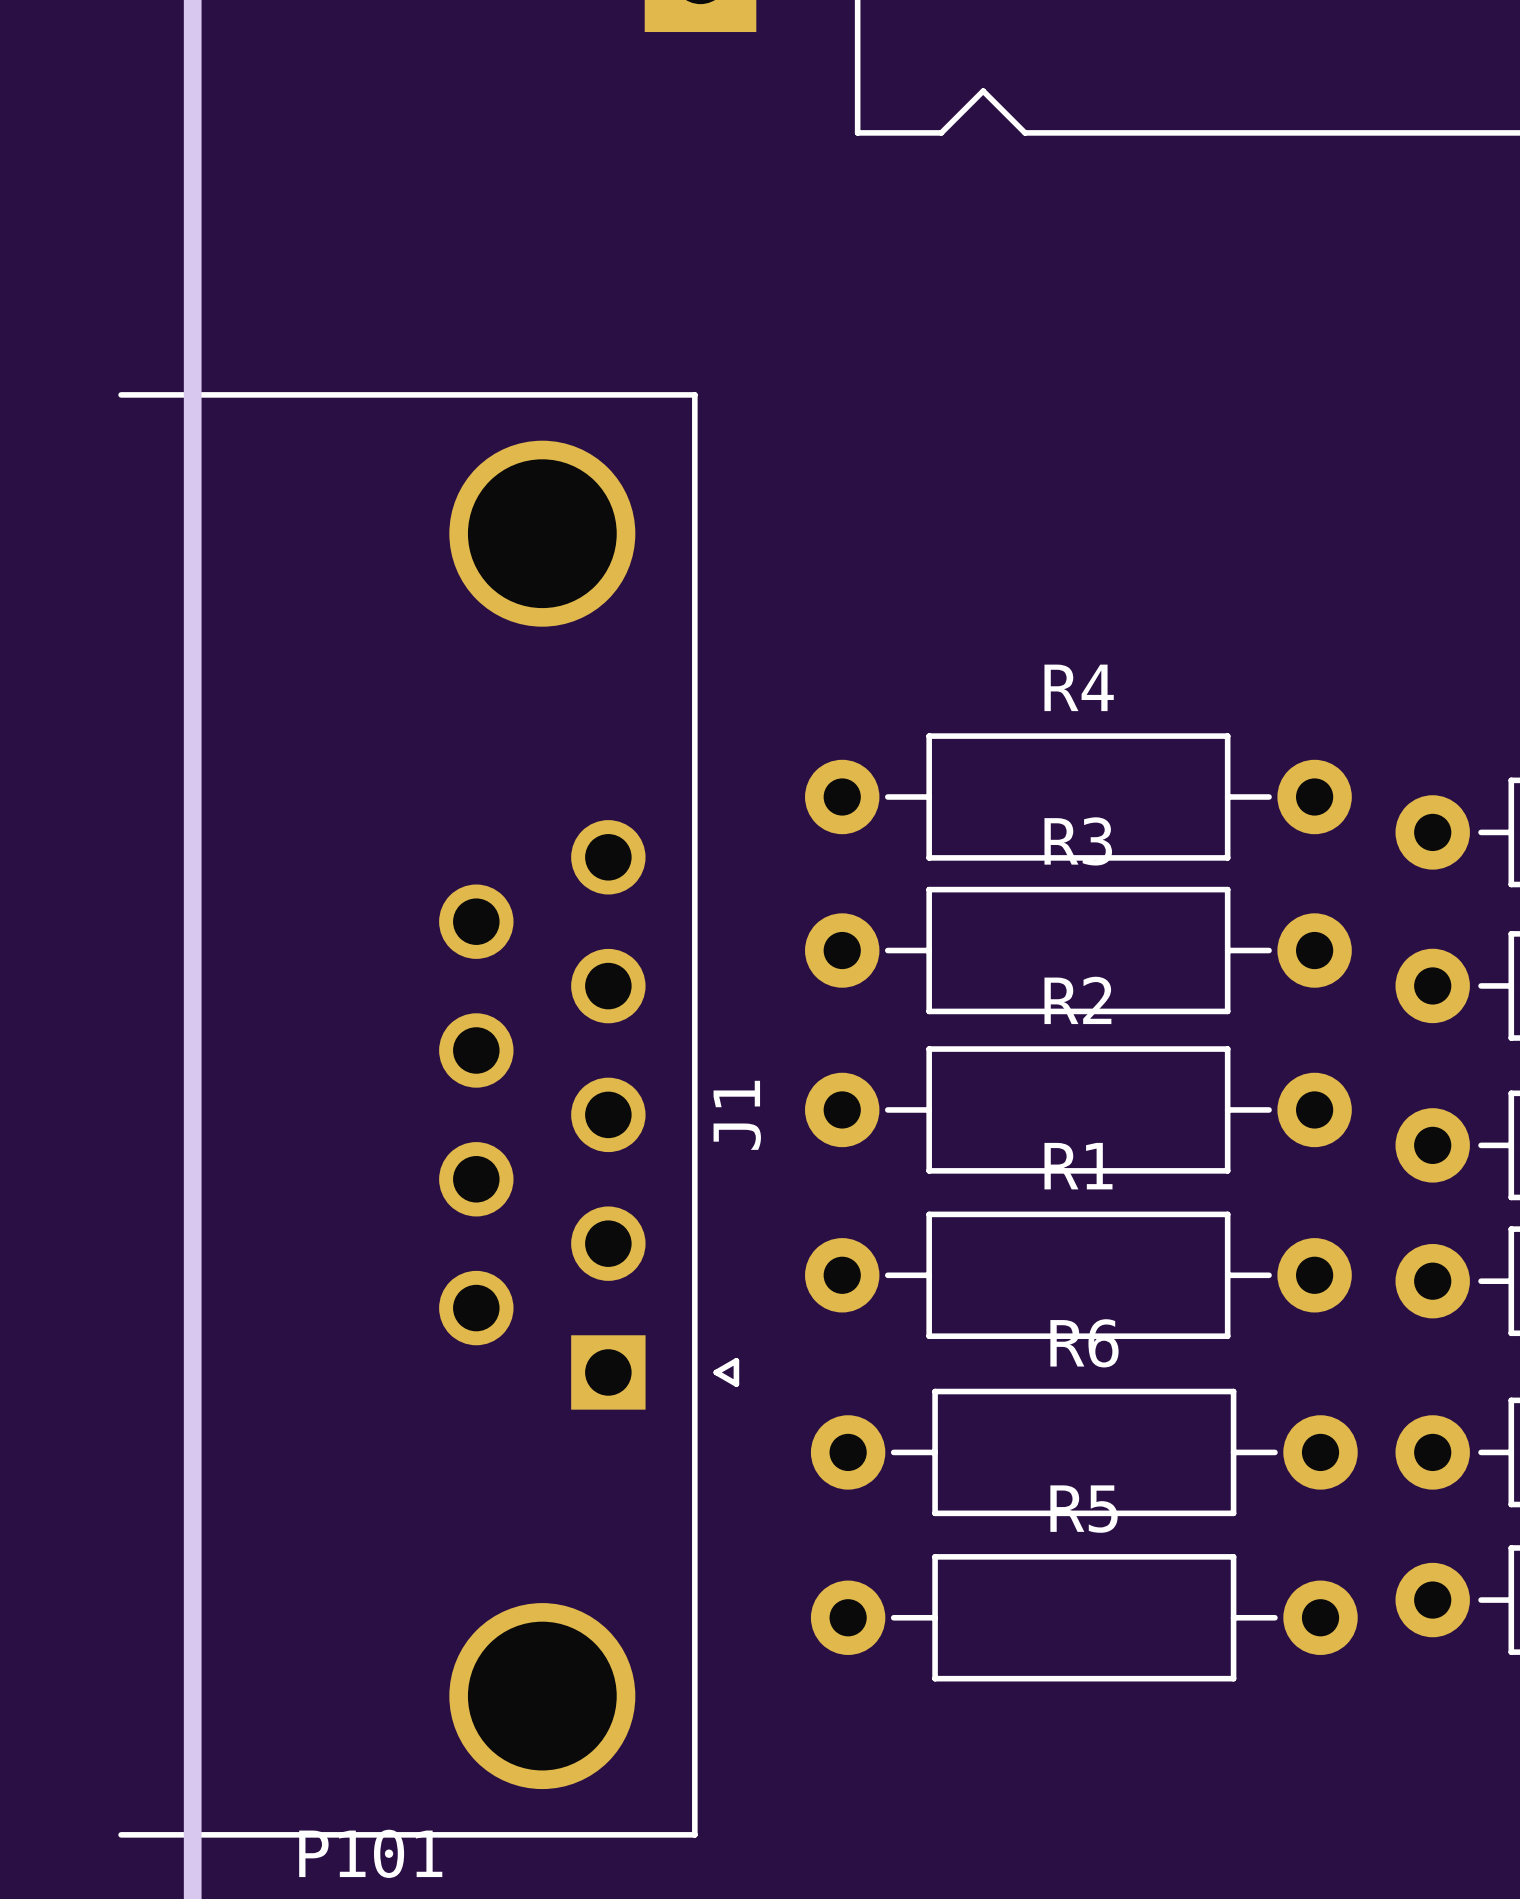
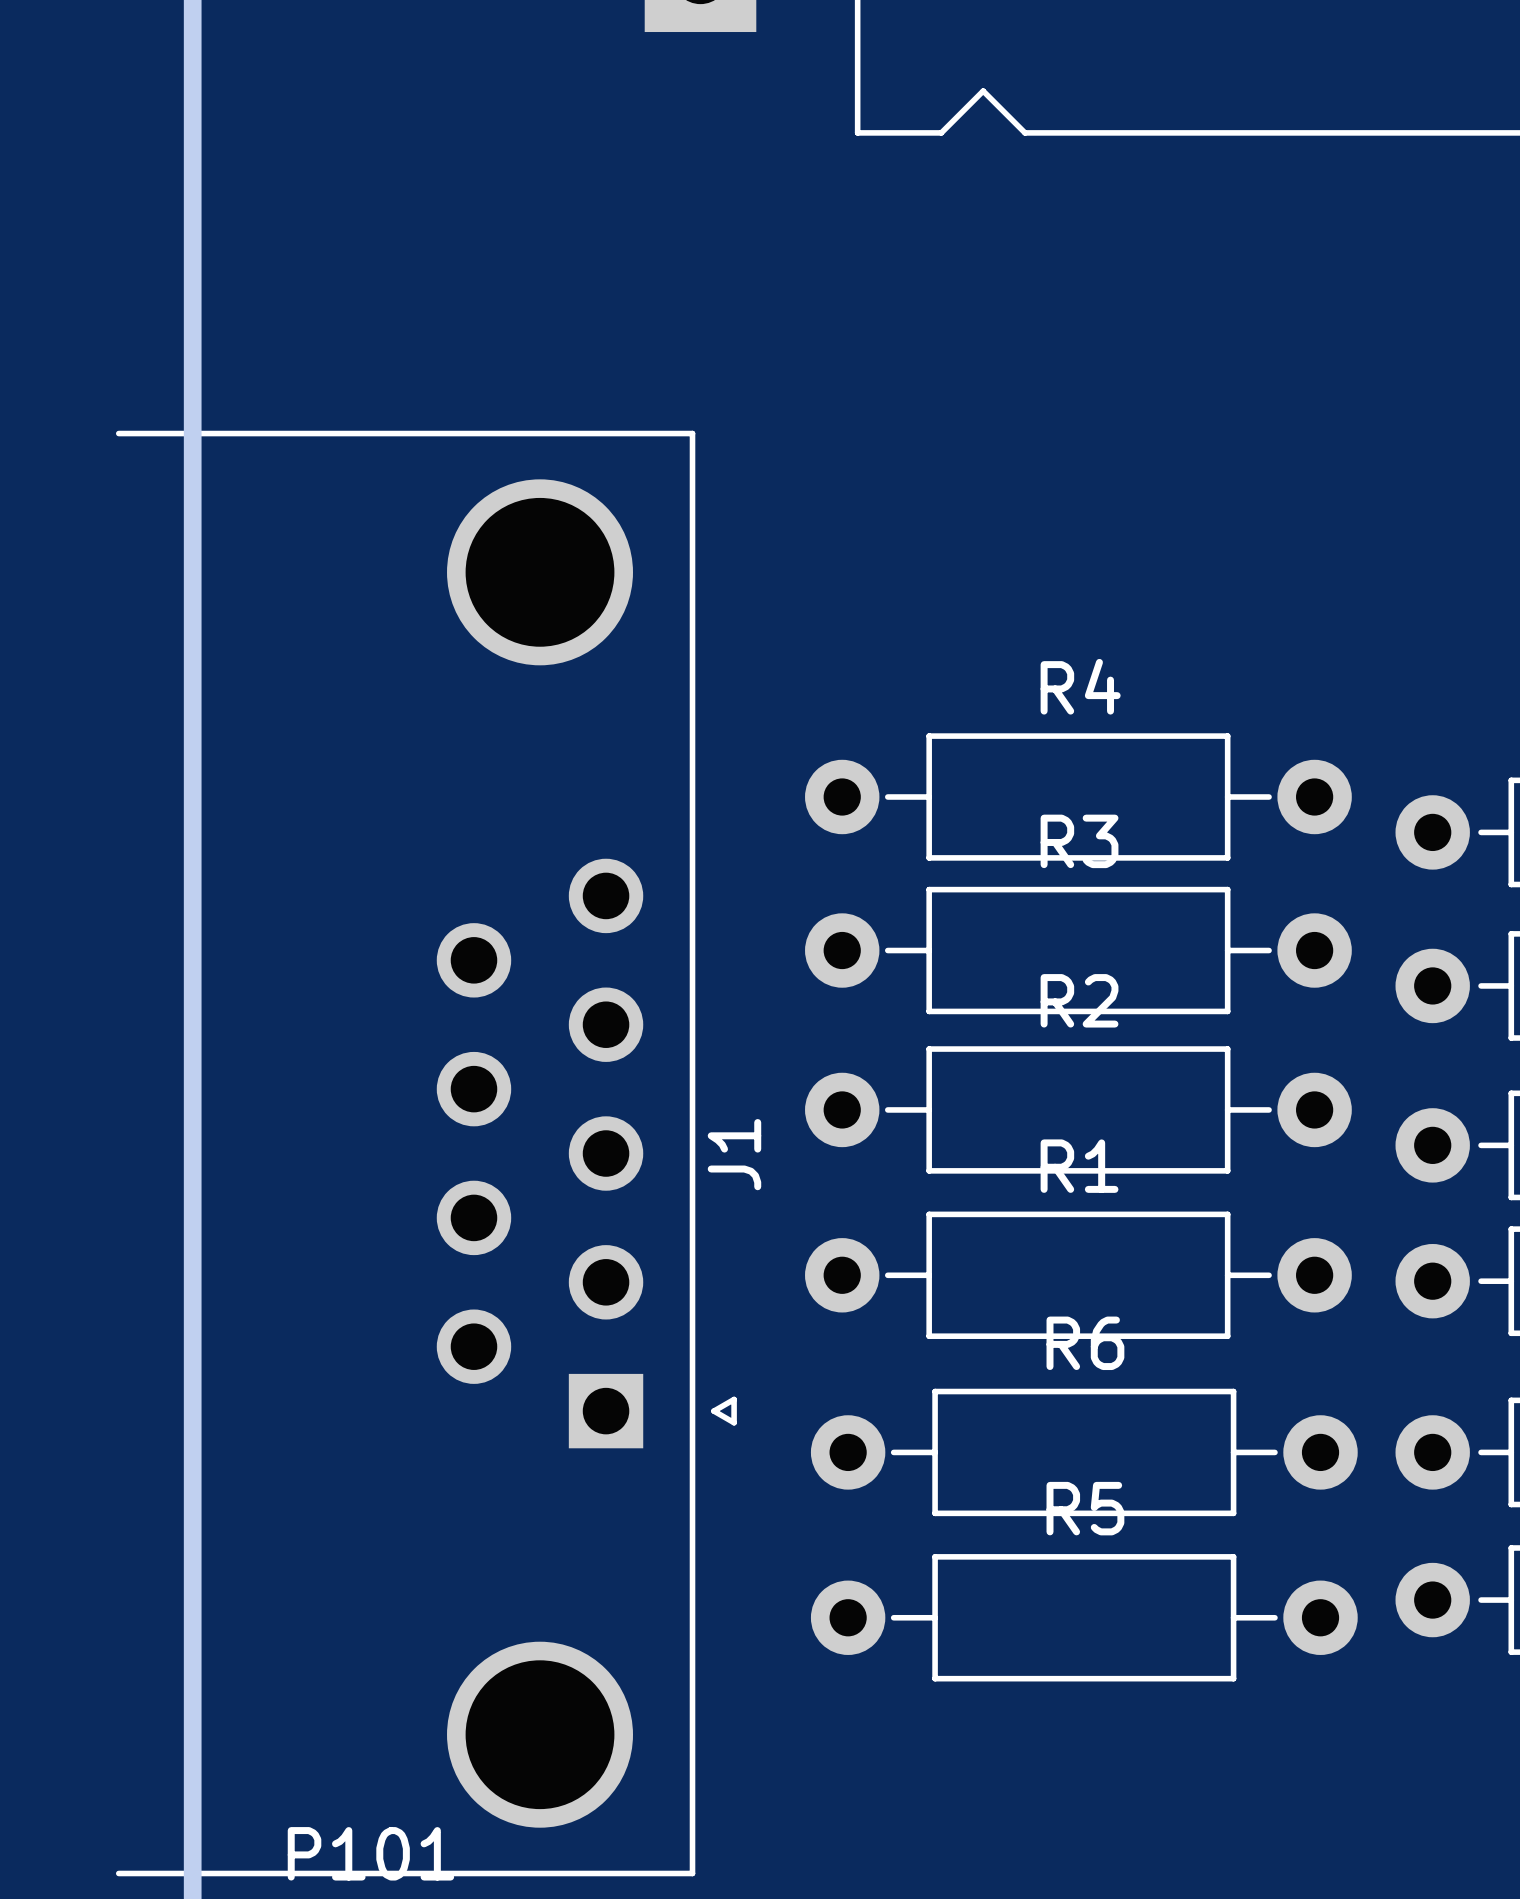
J1 position: (428, 1114) -> (426, 1153)

